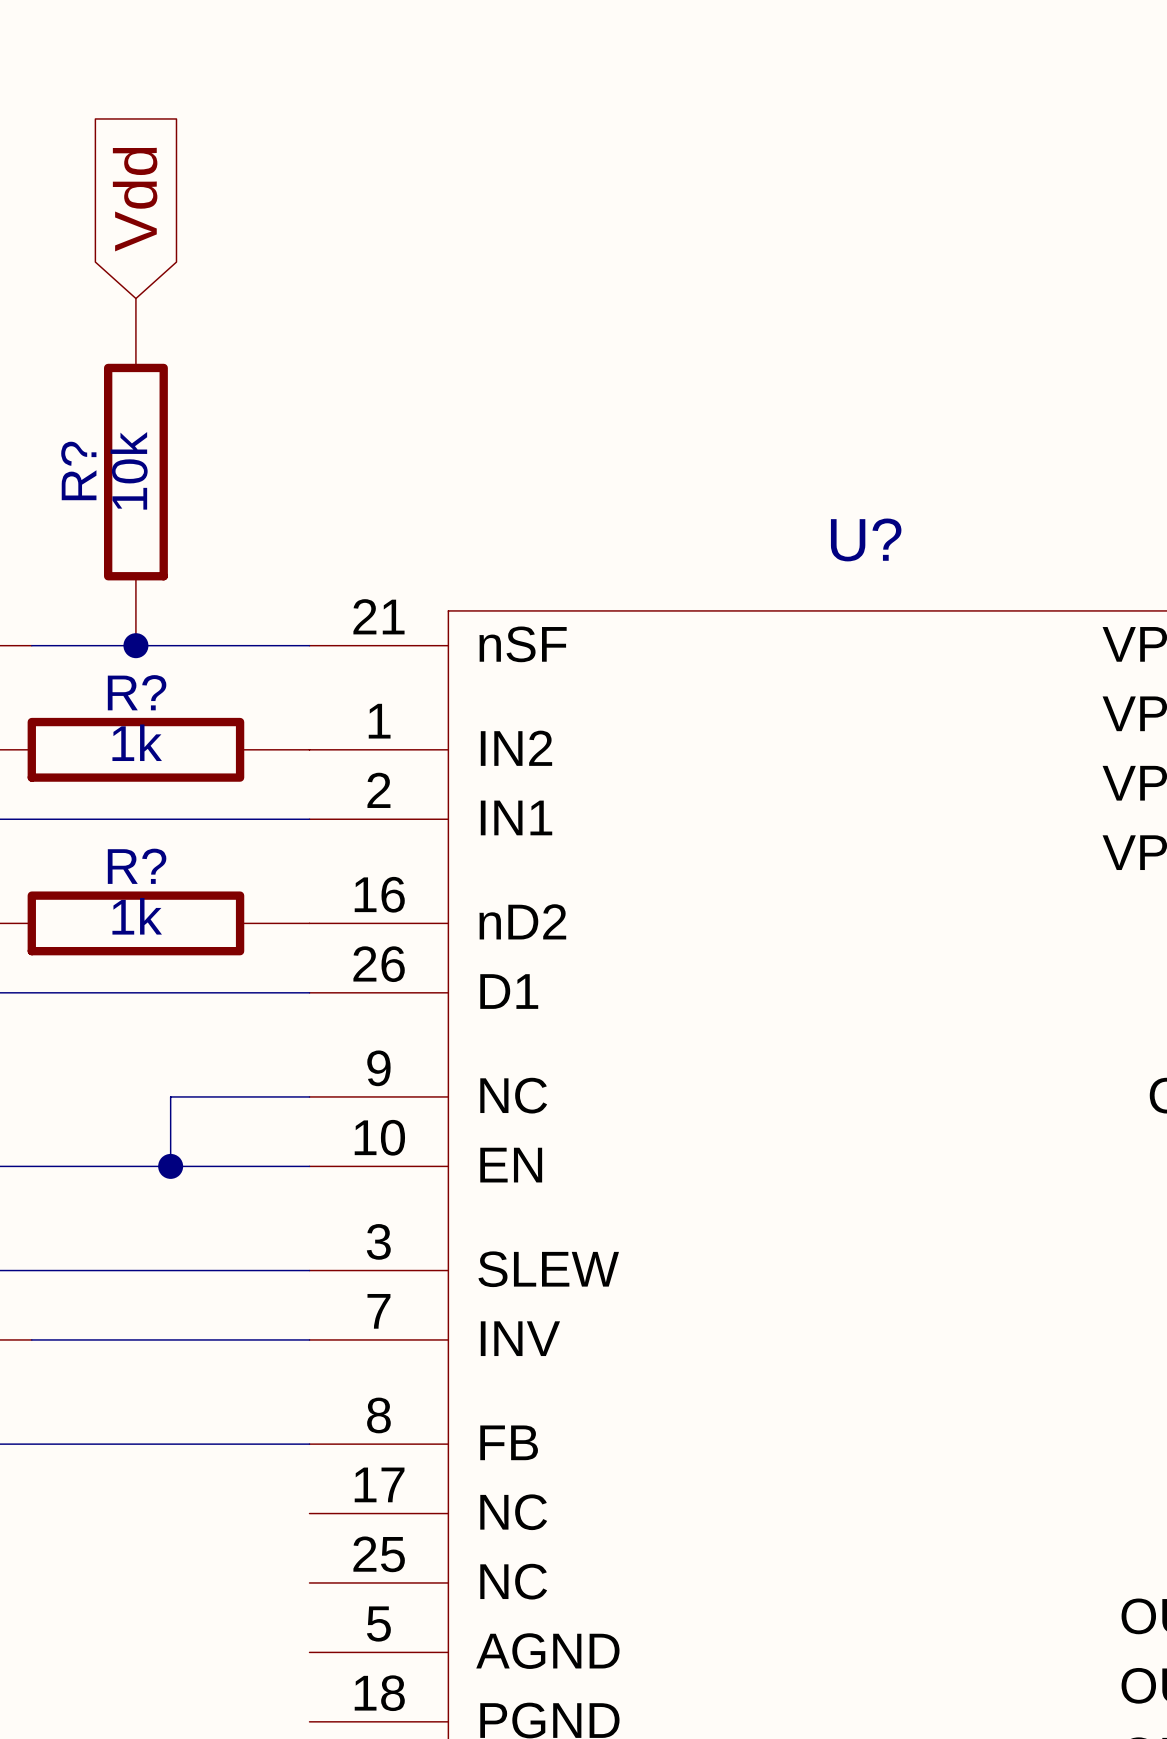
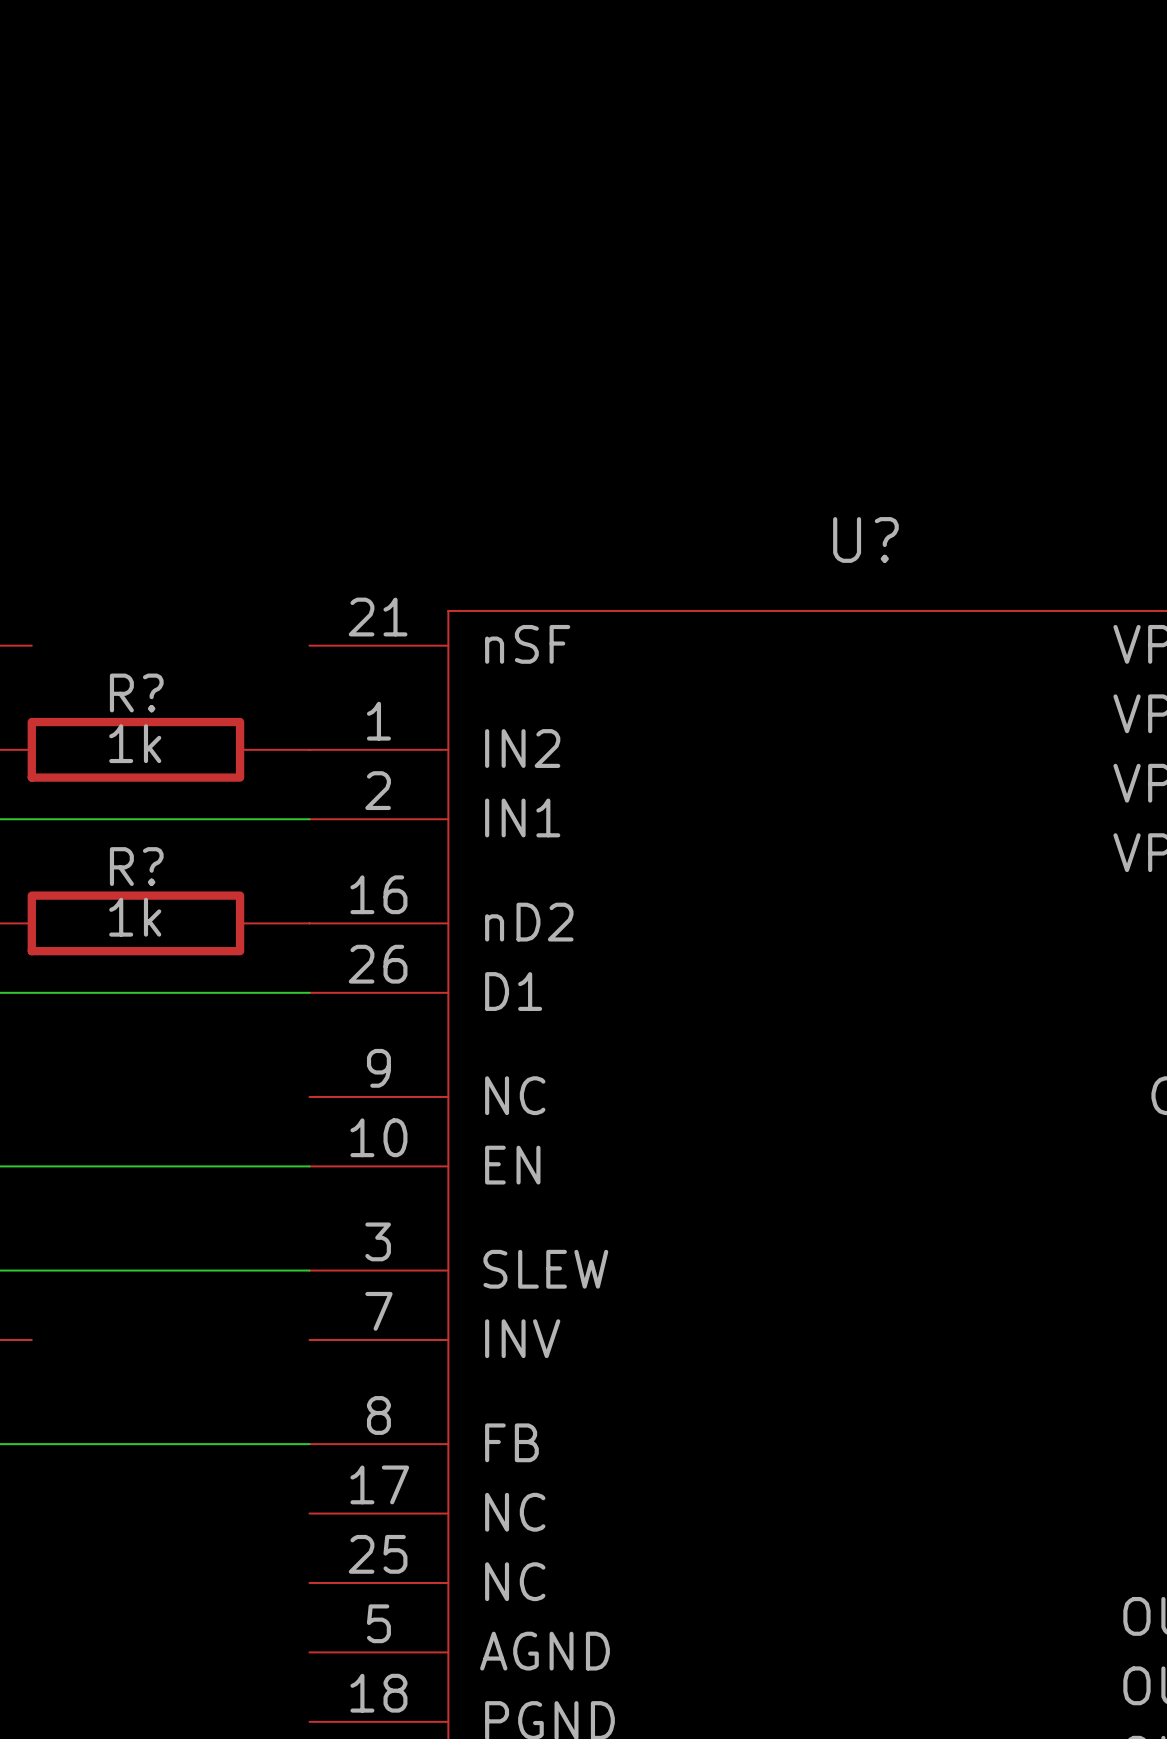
global label: Vdd (135, 199) -> none
R?: 10k (135, 472) -> none
wire: (31, 645) (309, 645) -> none
junction: (135, 645) -> none
wire: (309, 1096) (170, 1096) (170, 1166) -> none
junction: (170, 1166) -> none
wire: (31, 1339) (309, 1339) -> none

